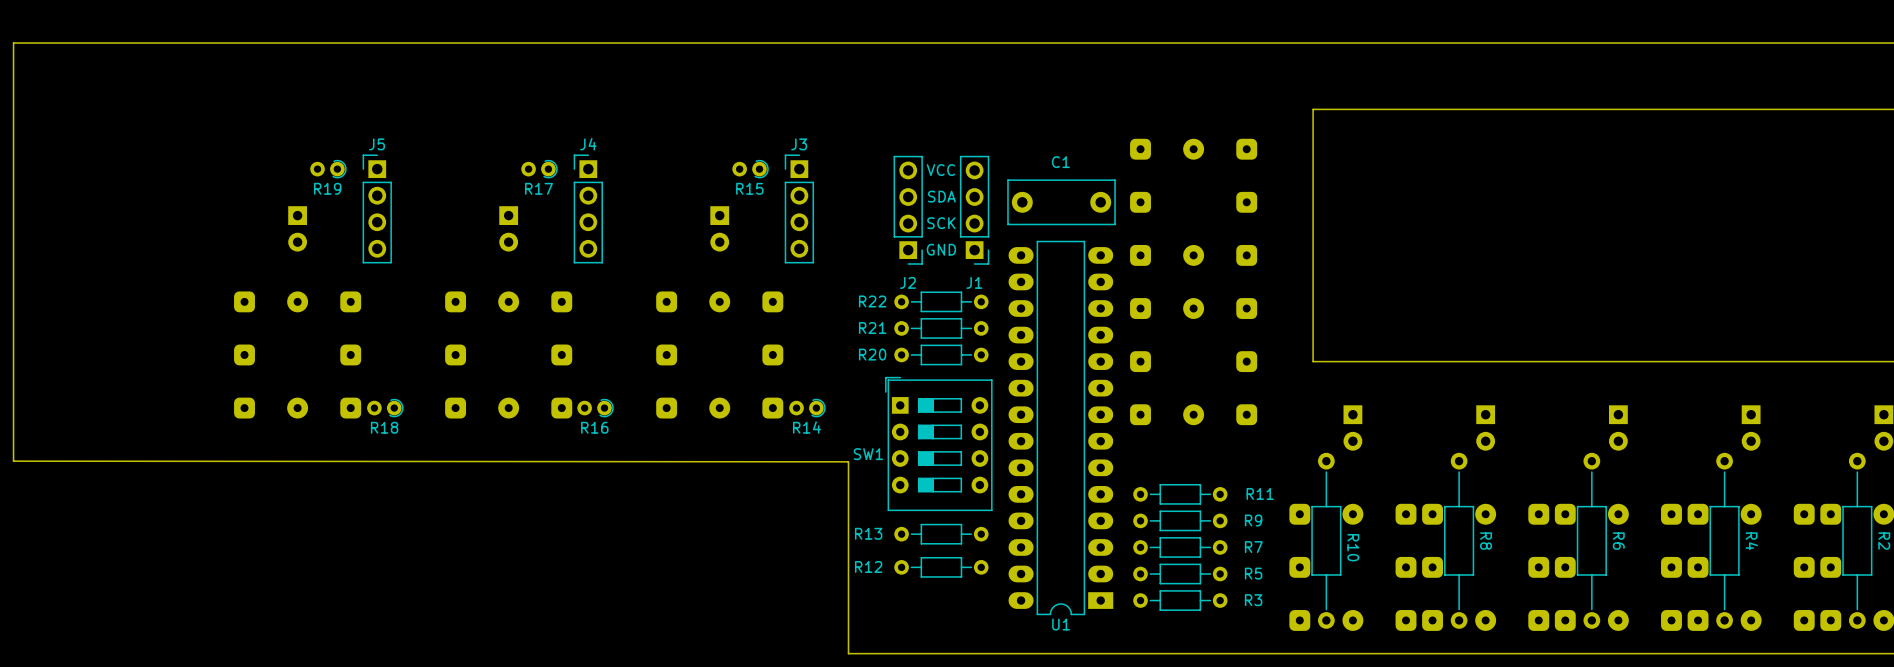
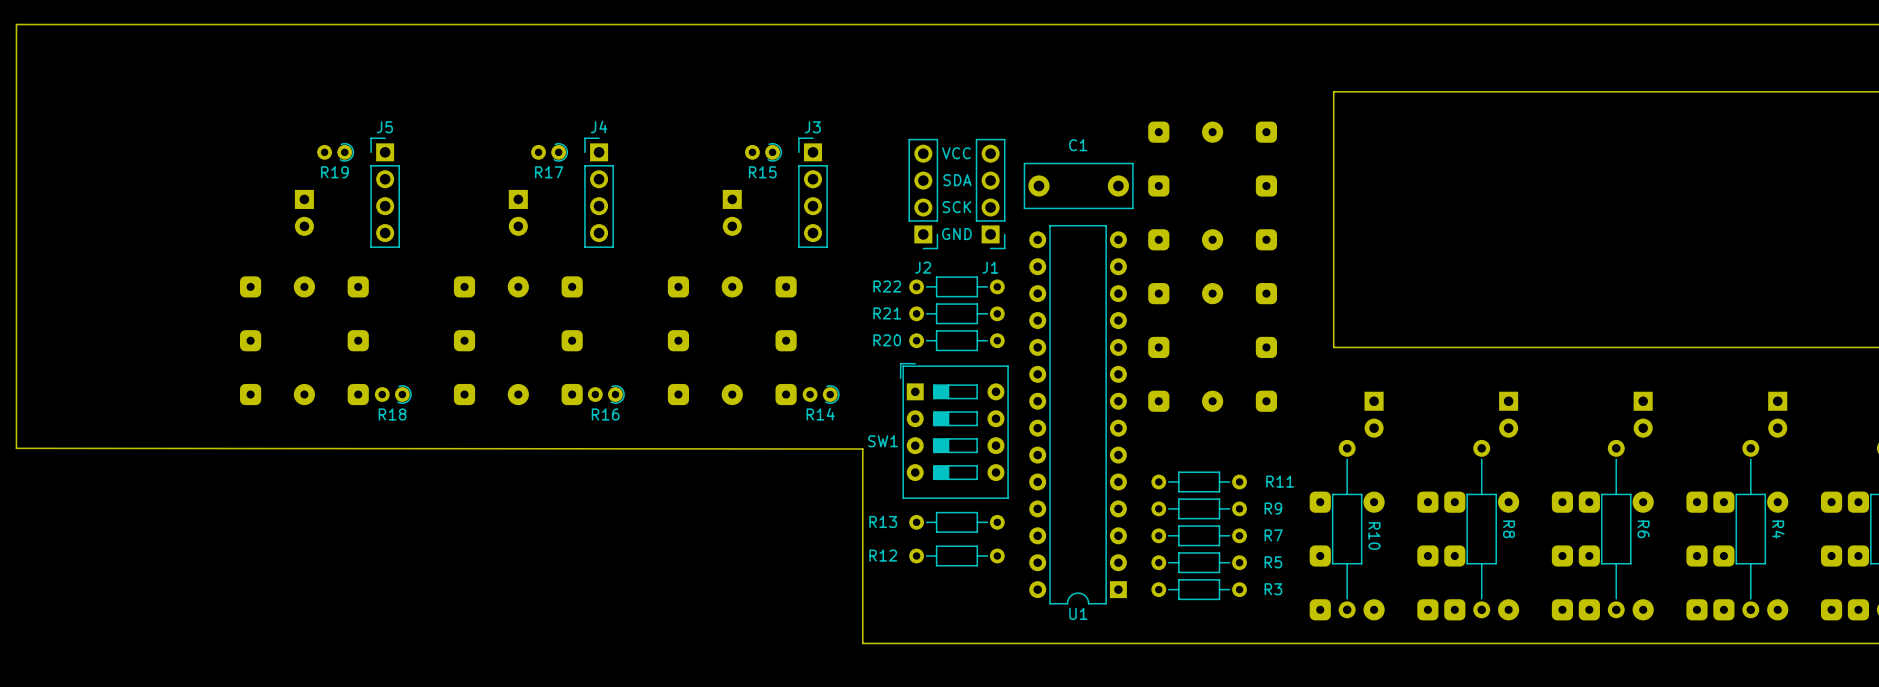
U1 footprint: [1008, 240, 1114, 616] -> [1029, 225, 1127, 605]

